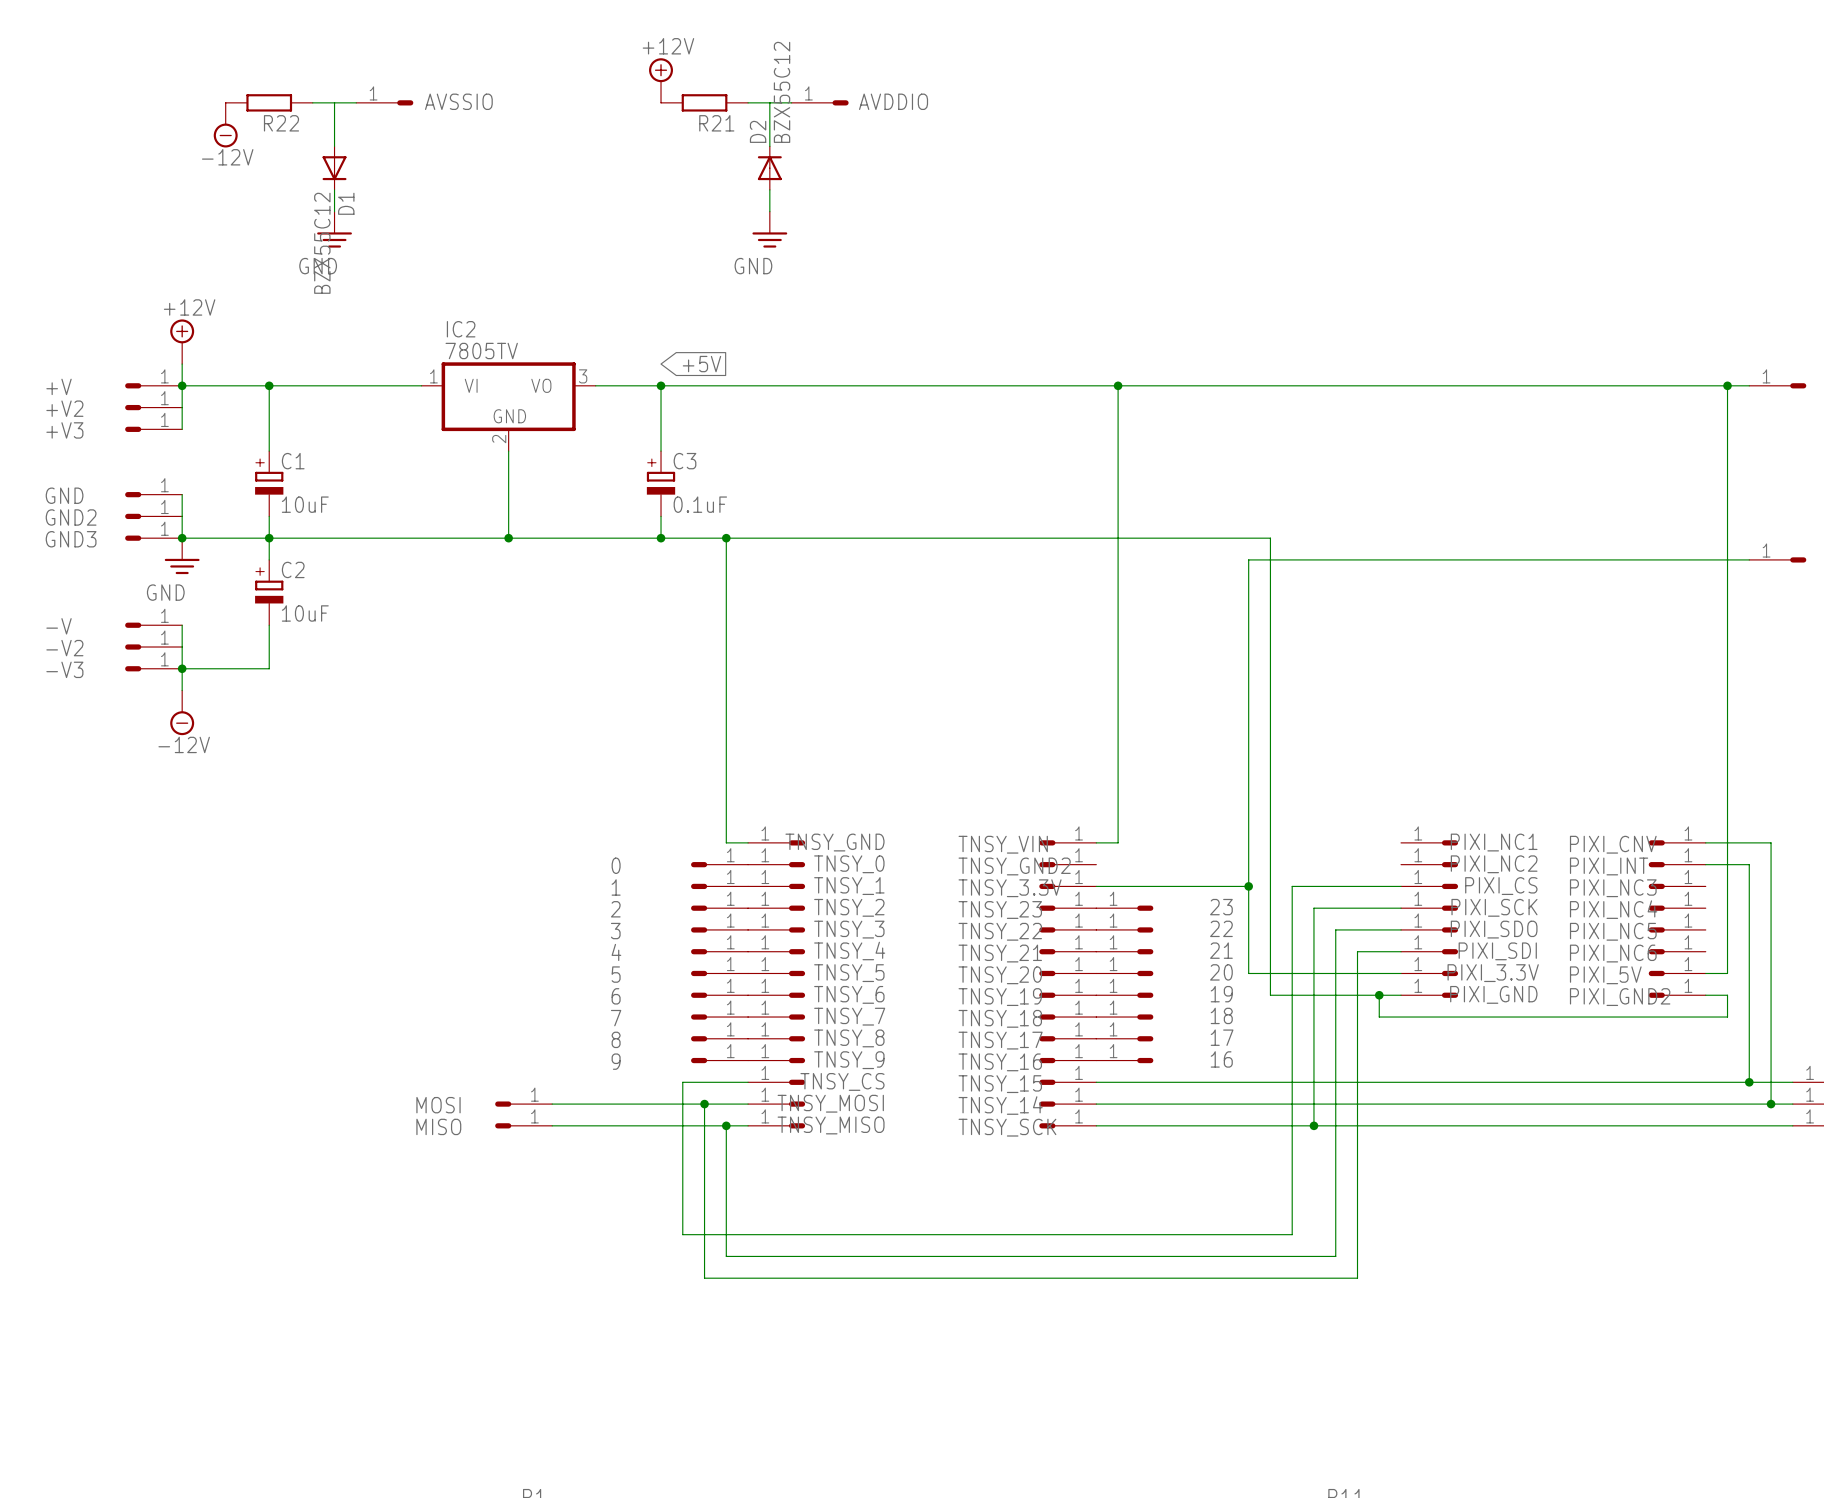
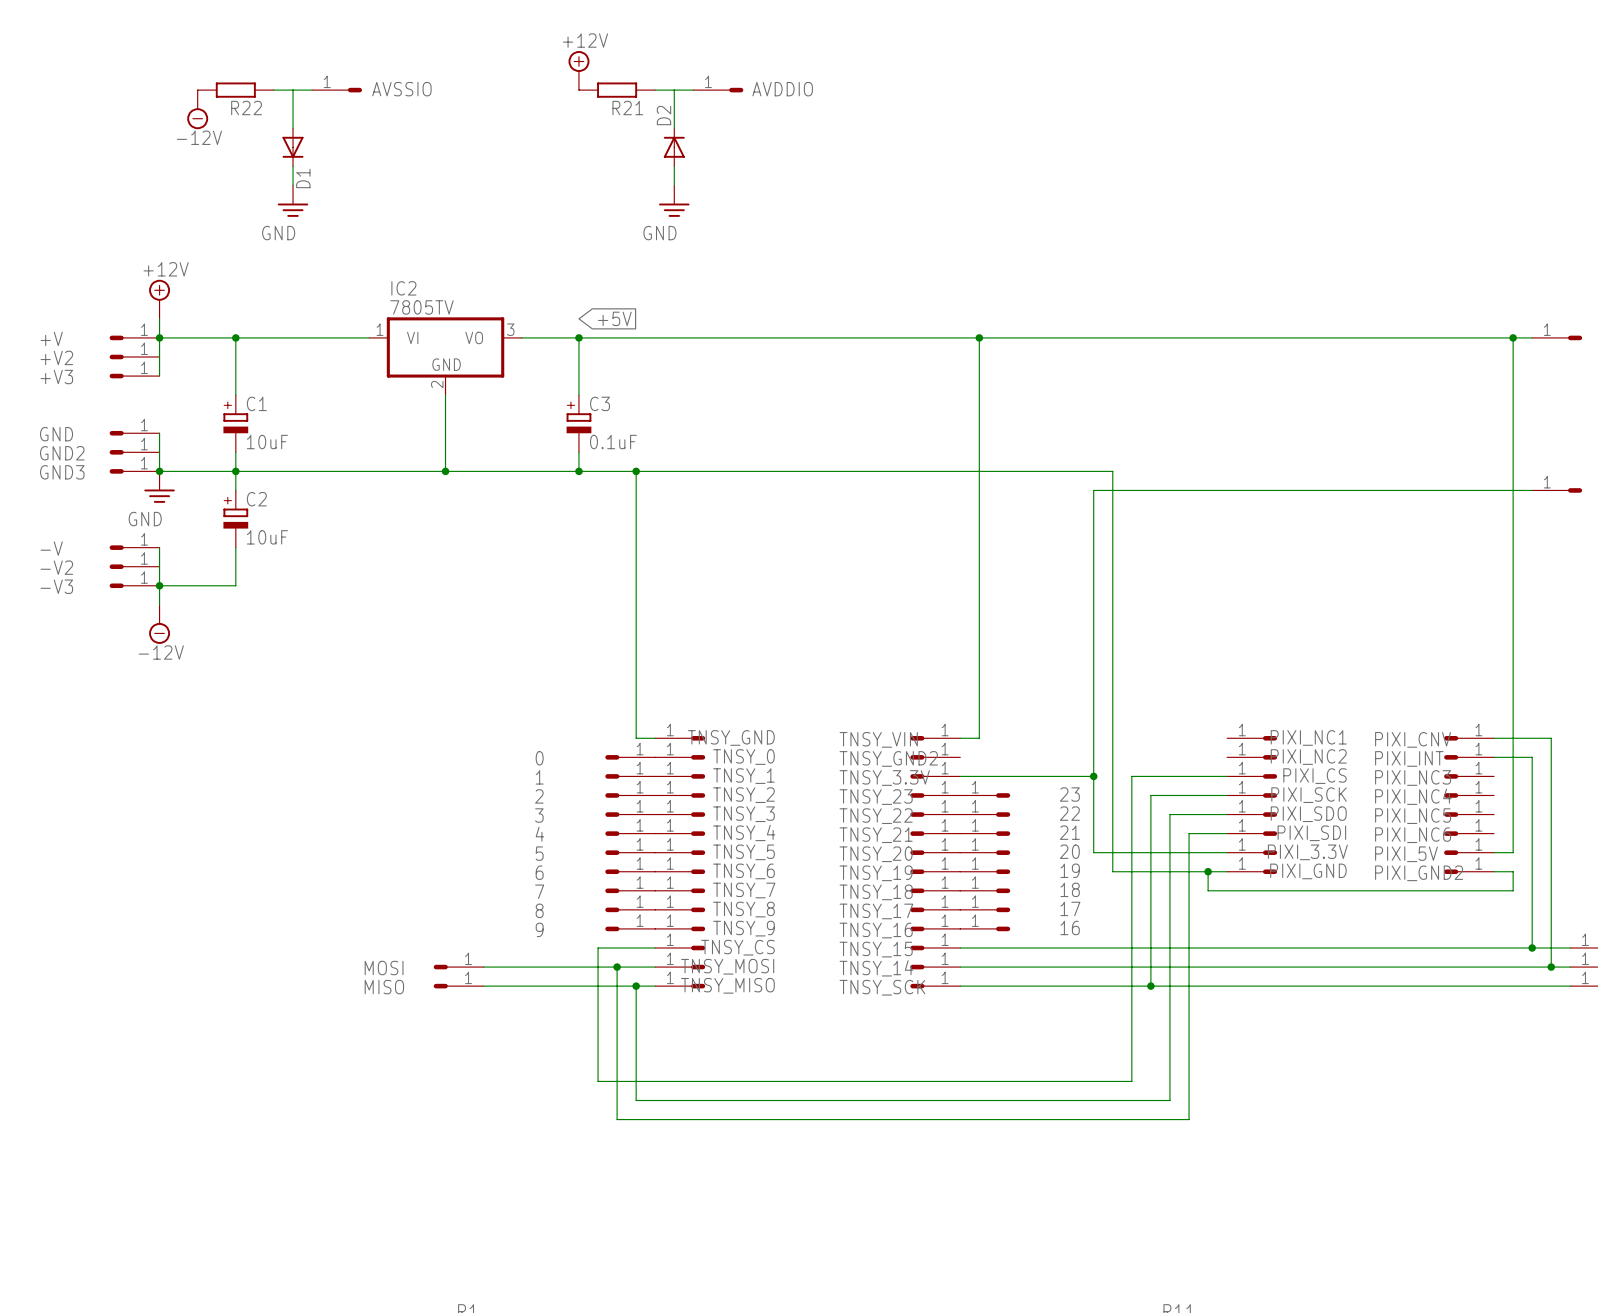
D2 value: BZX55C12 (782, 92) -> none
D1 value: BZX55C12 (322, 243) -> none

